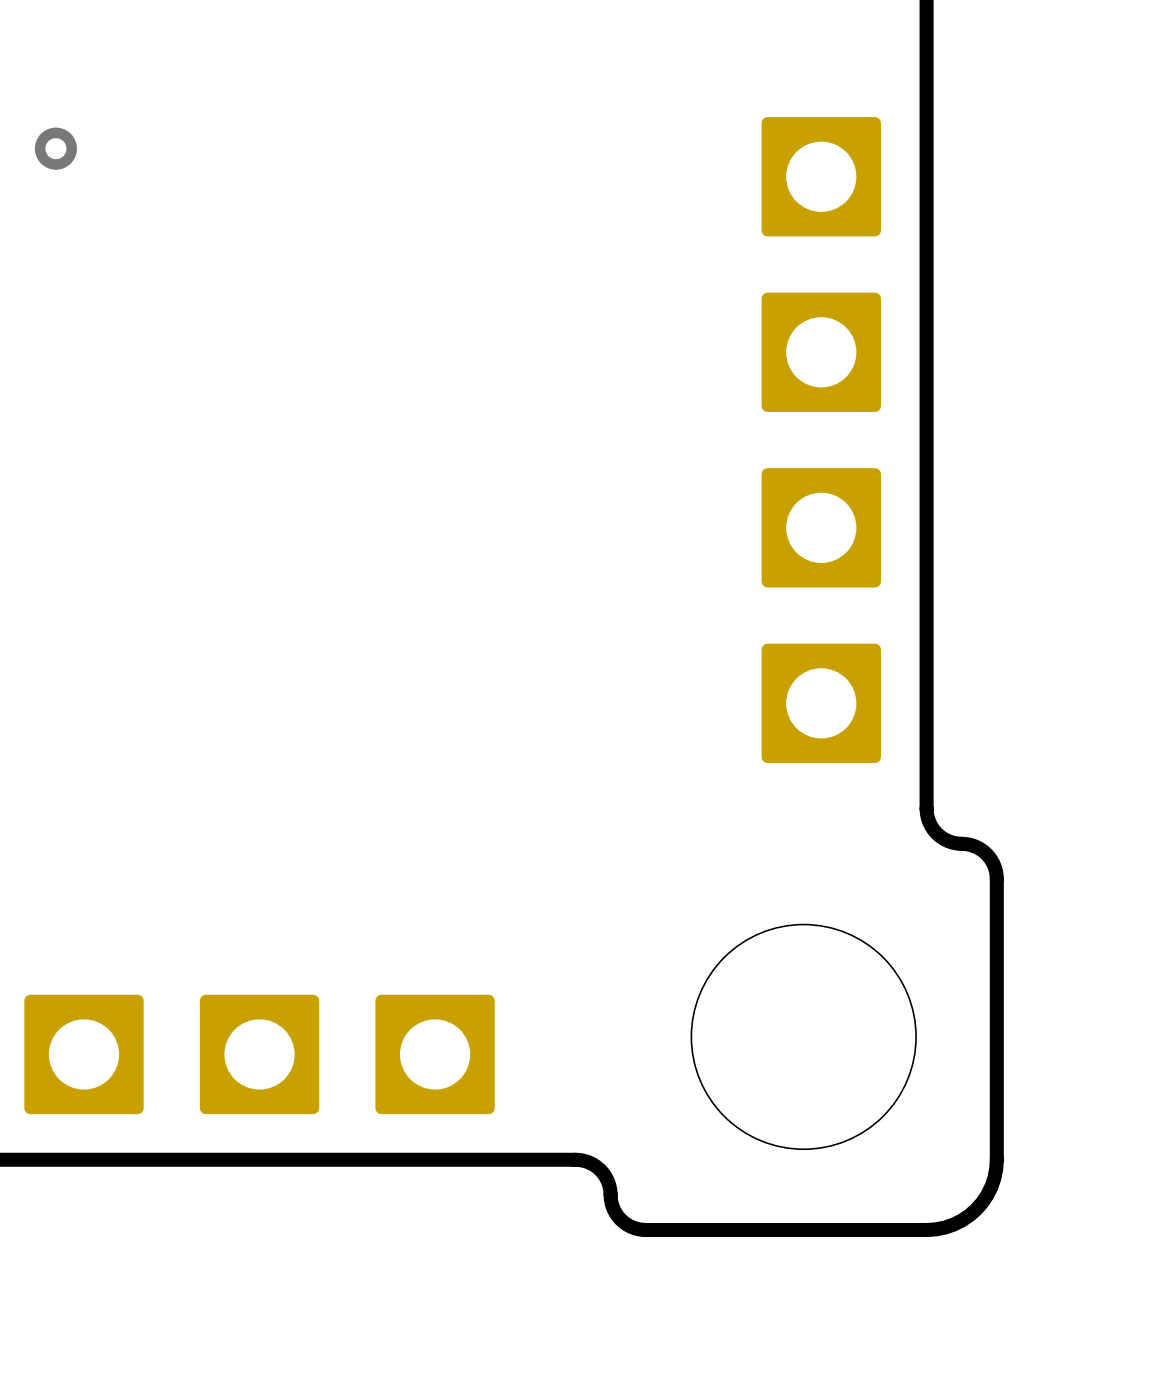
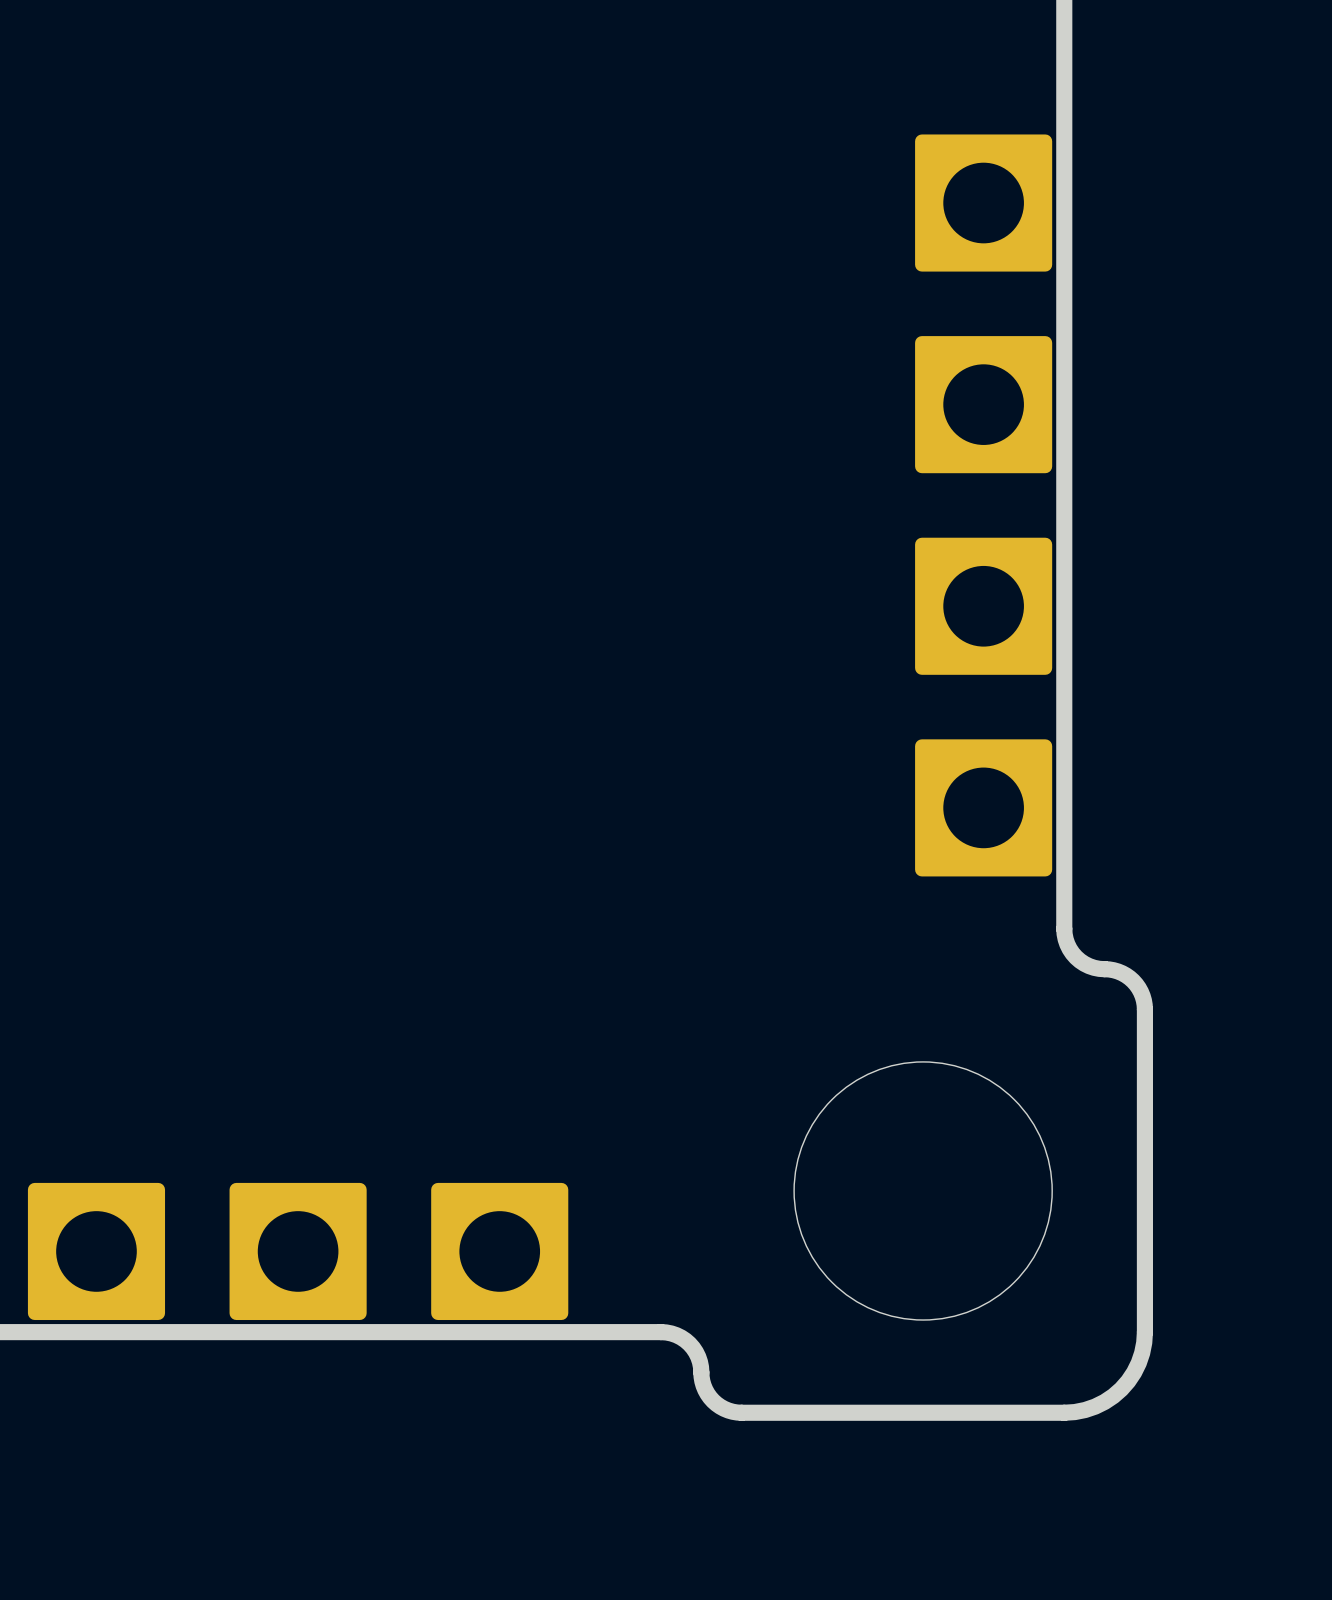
via: (55, 148) -> none
part position: (821, 176) -> (983, 203)
part position: (821, 352) -> (983, 404)
part position: (821, 527) -> (983, 606)
part position: (821, 703) -> (983, 807)
part position: (84, 1054) -> (96, 1251)
part position: (259, 1054) -> (298, 1251)
part position: (435, 1054) -> (499, 1251)

